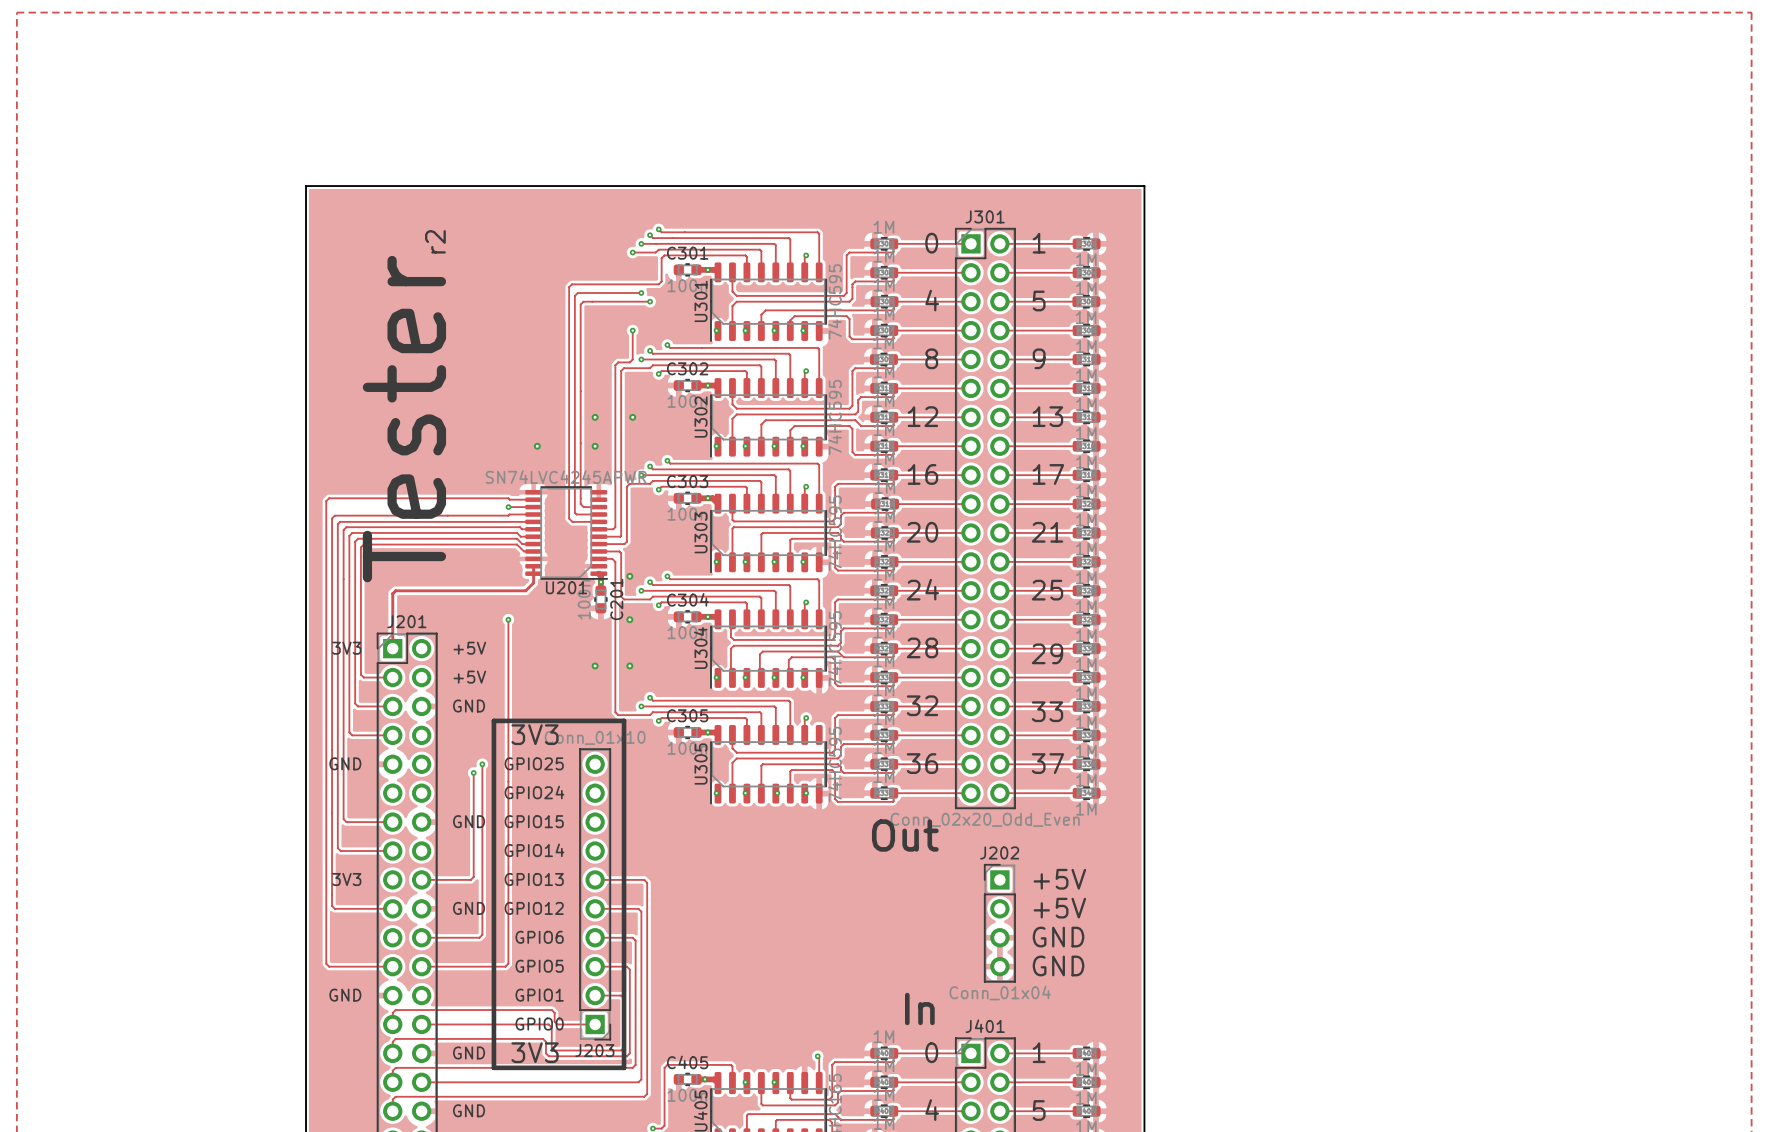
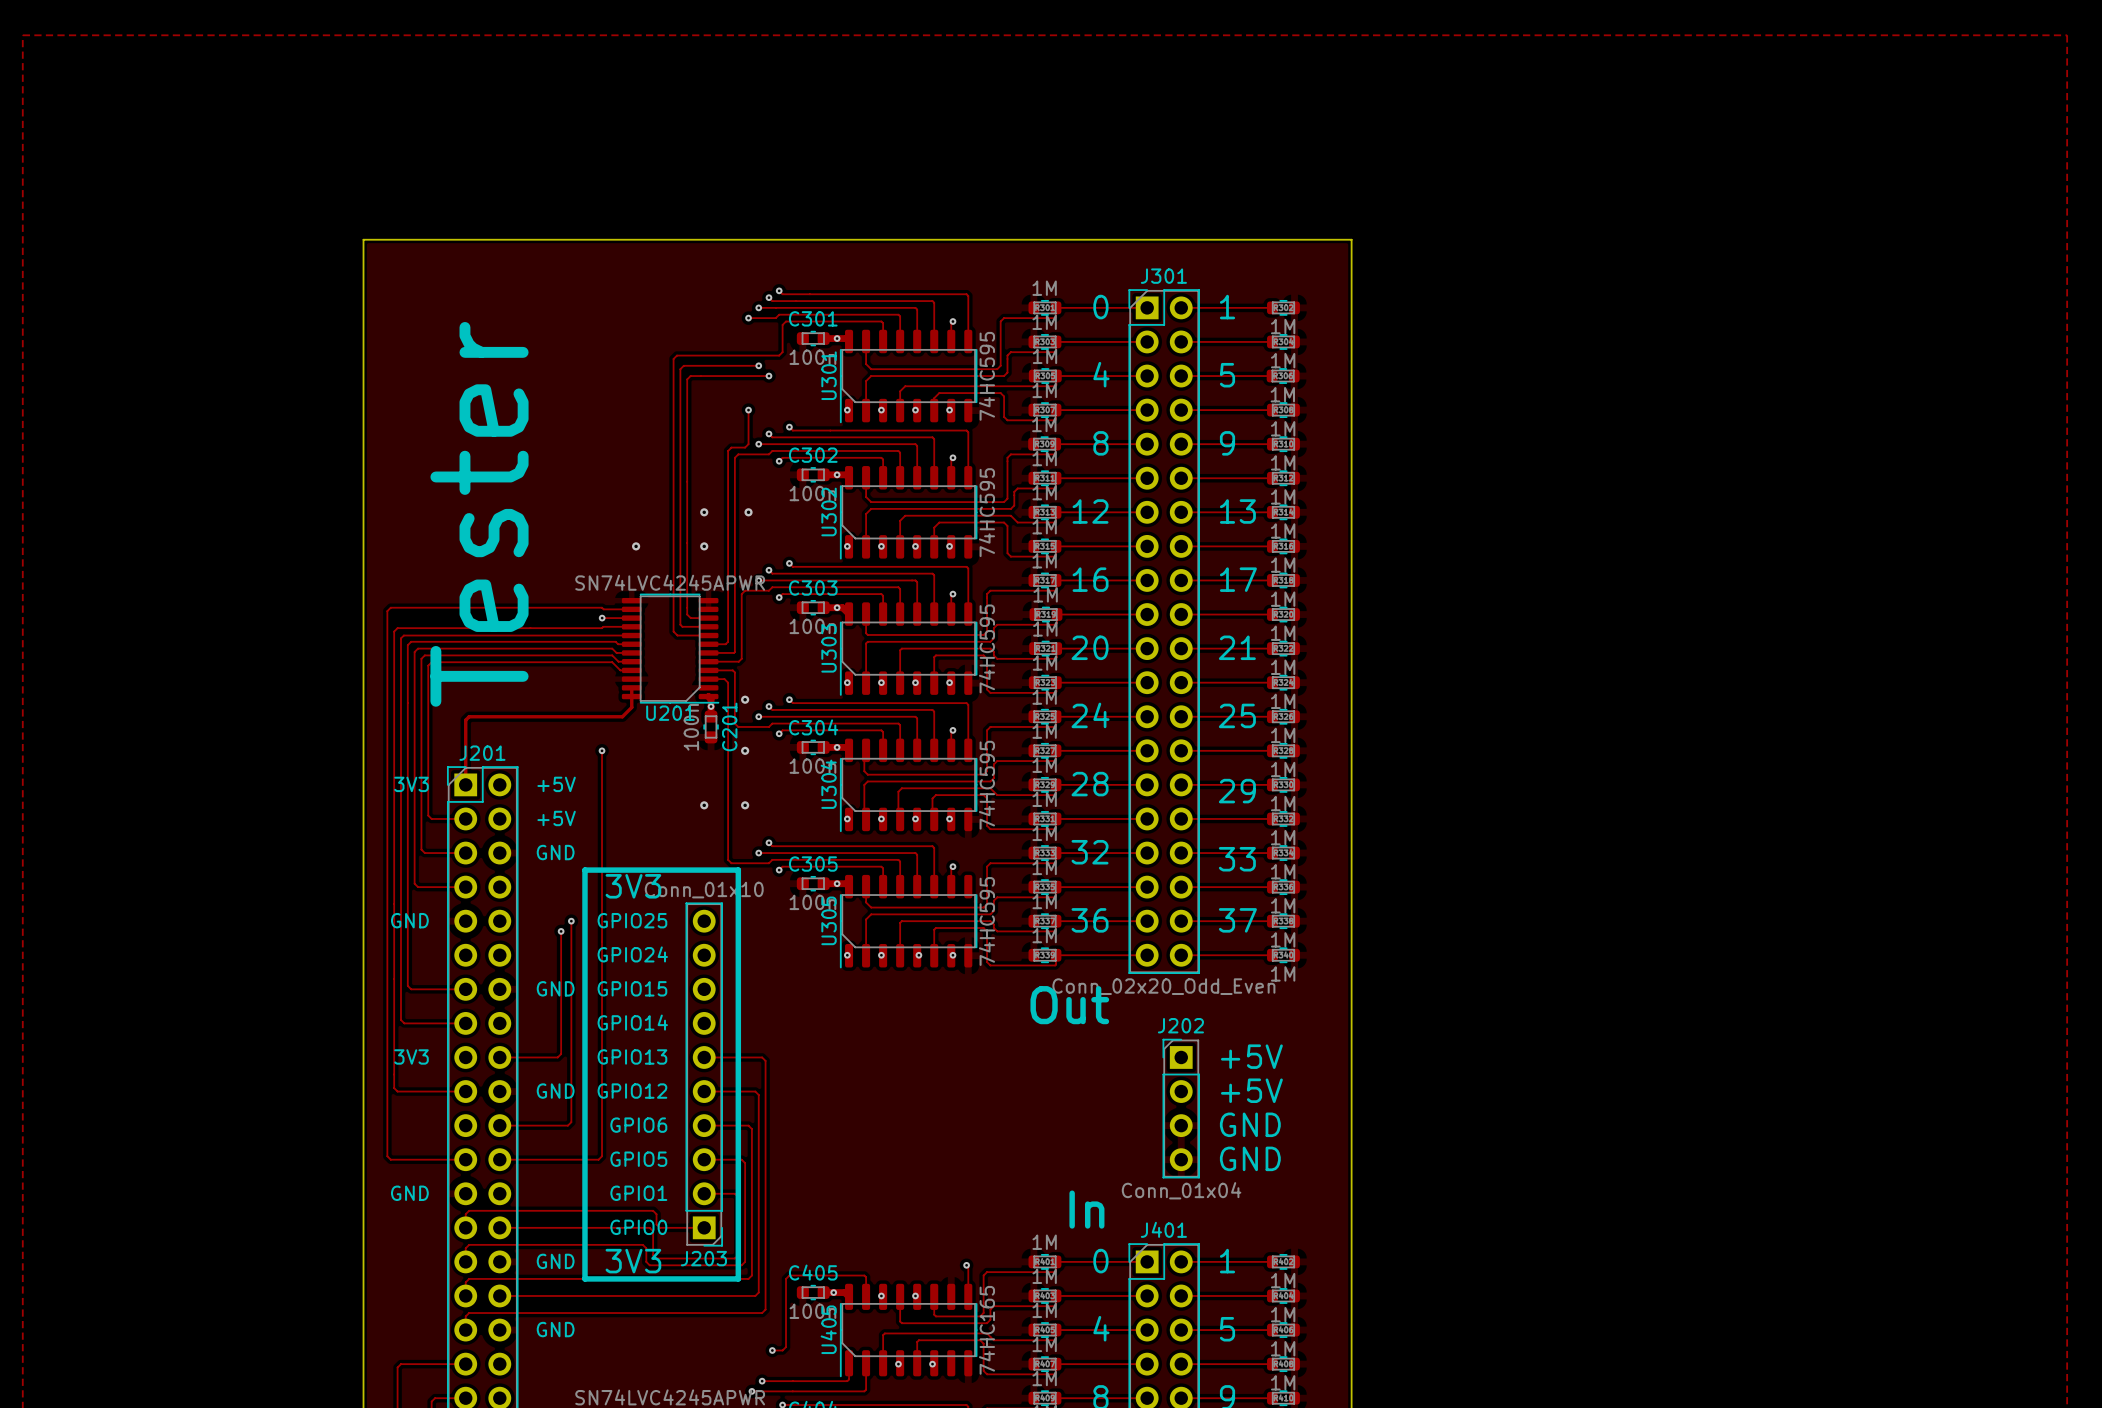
text: r2 (435, 241) -> none

